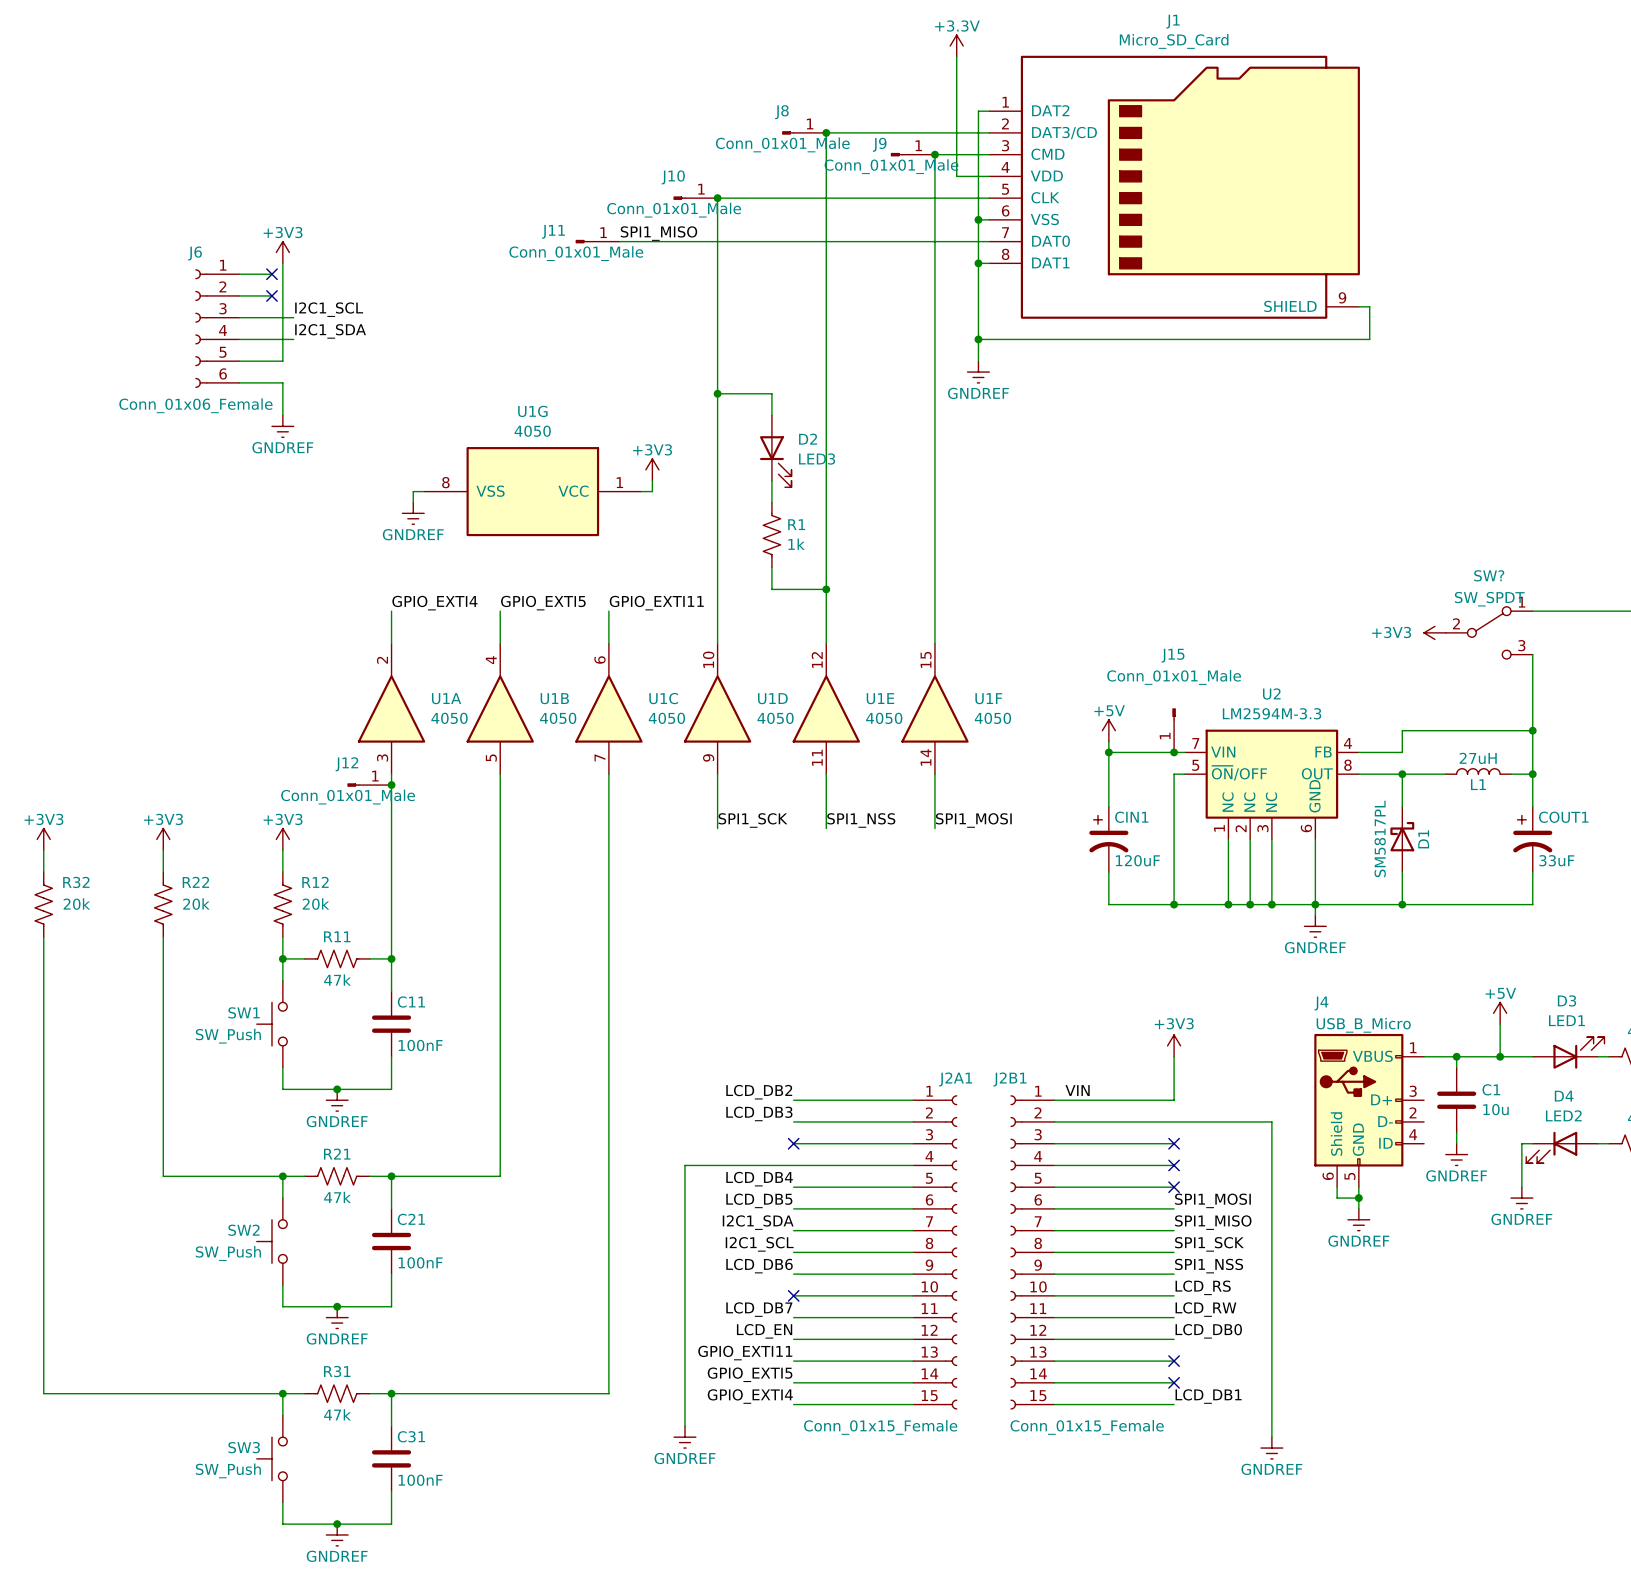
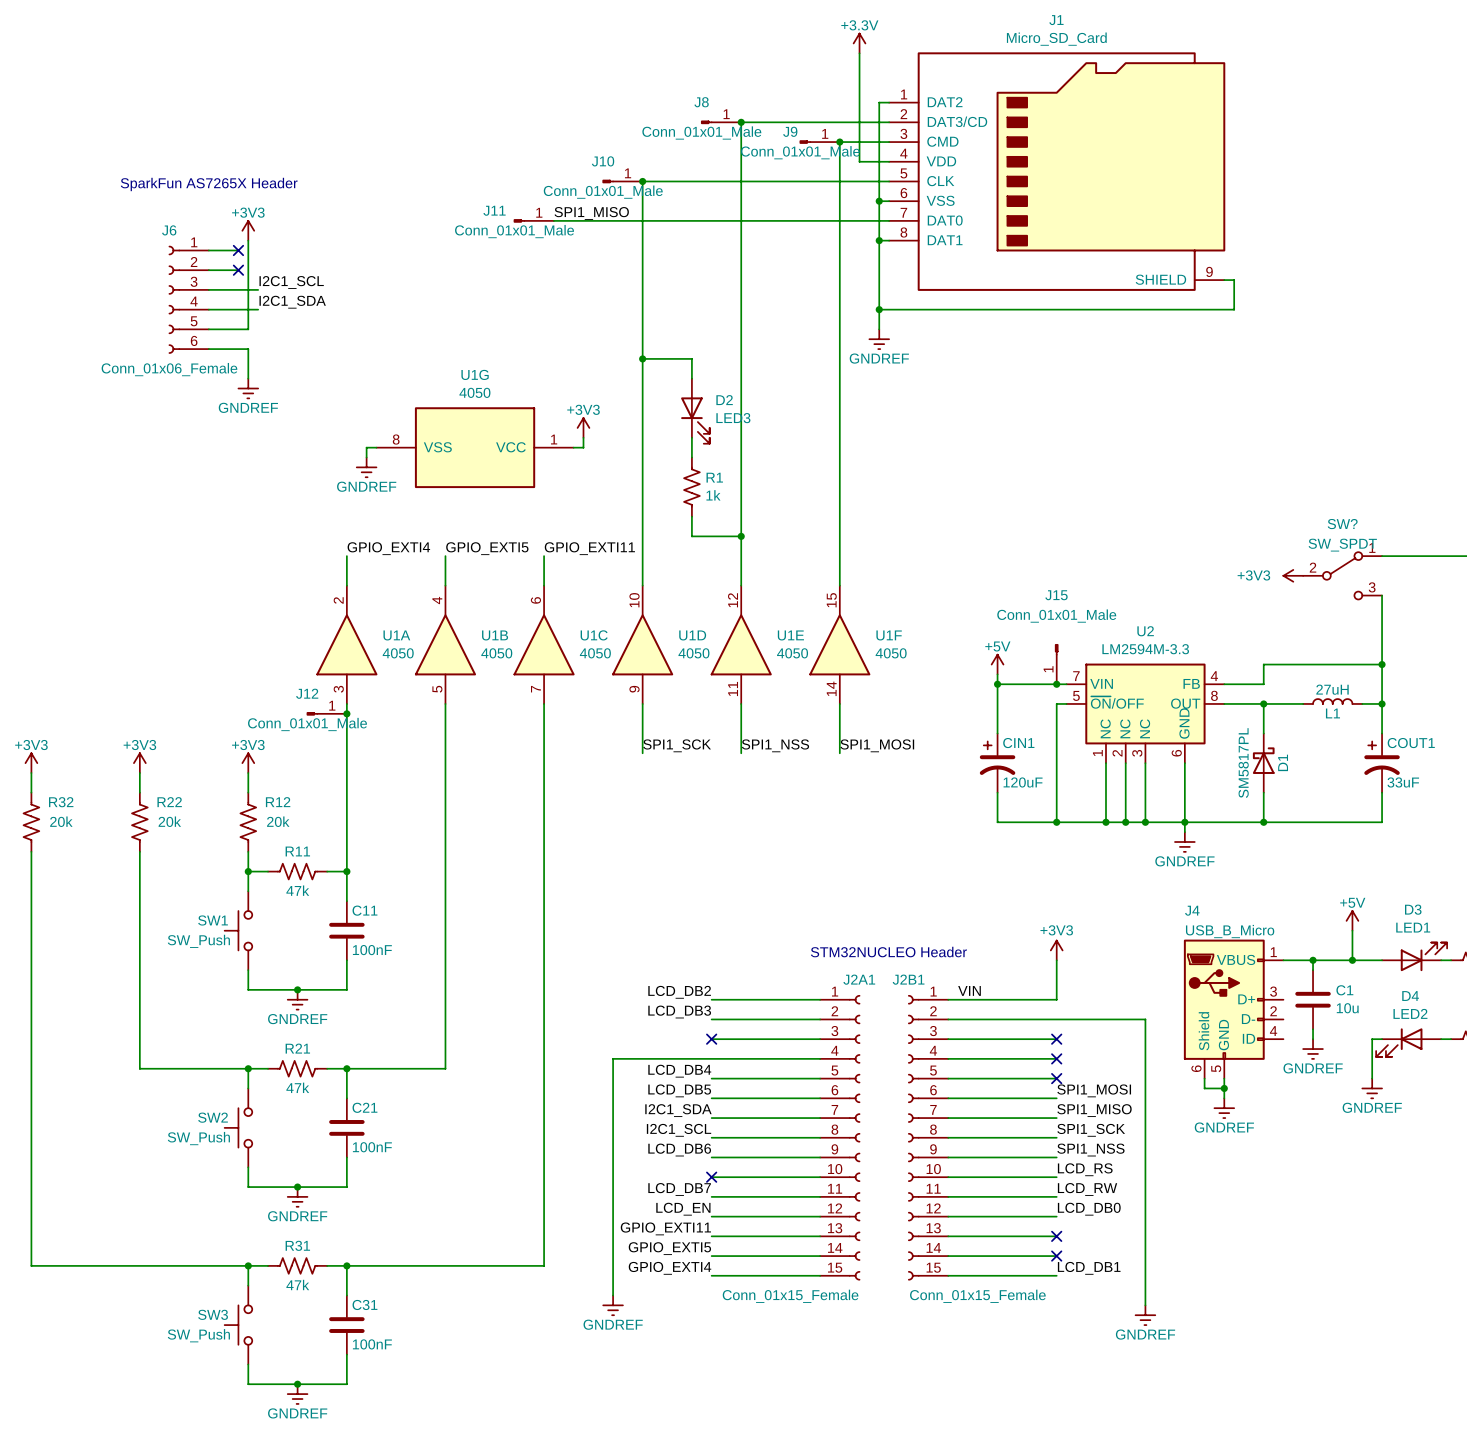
text: none -> SparkFun AS7265X Header (209, 184)
text: none -> STM32NUCLEO Header (888, 952)

